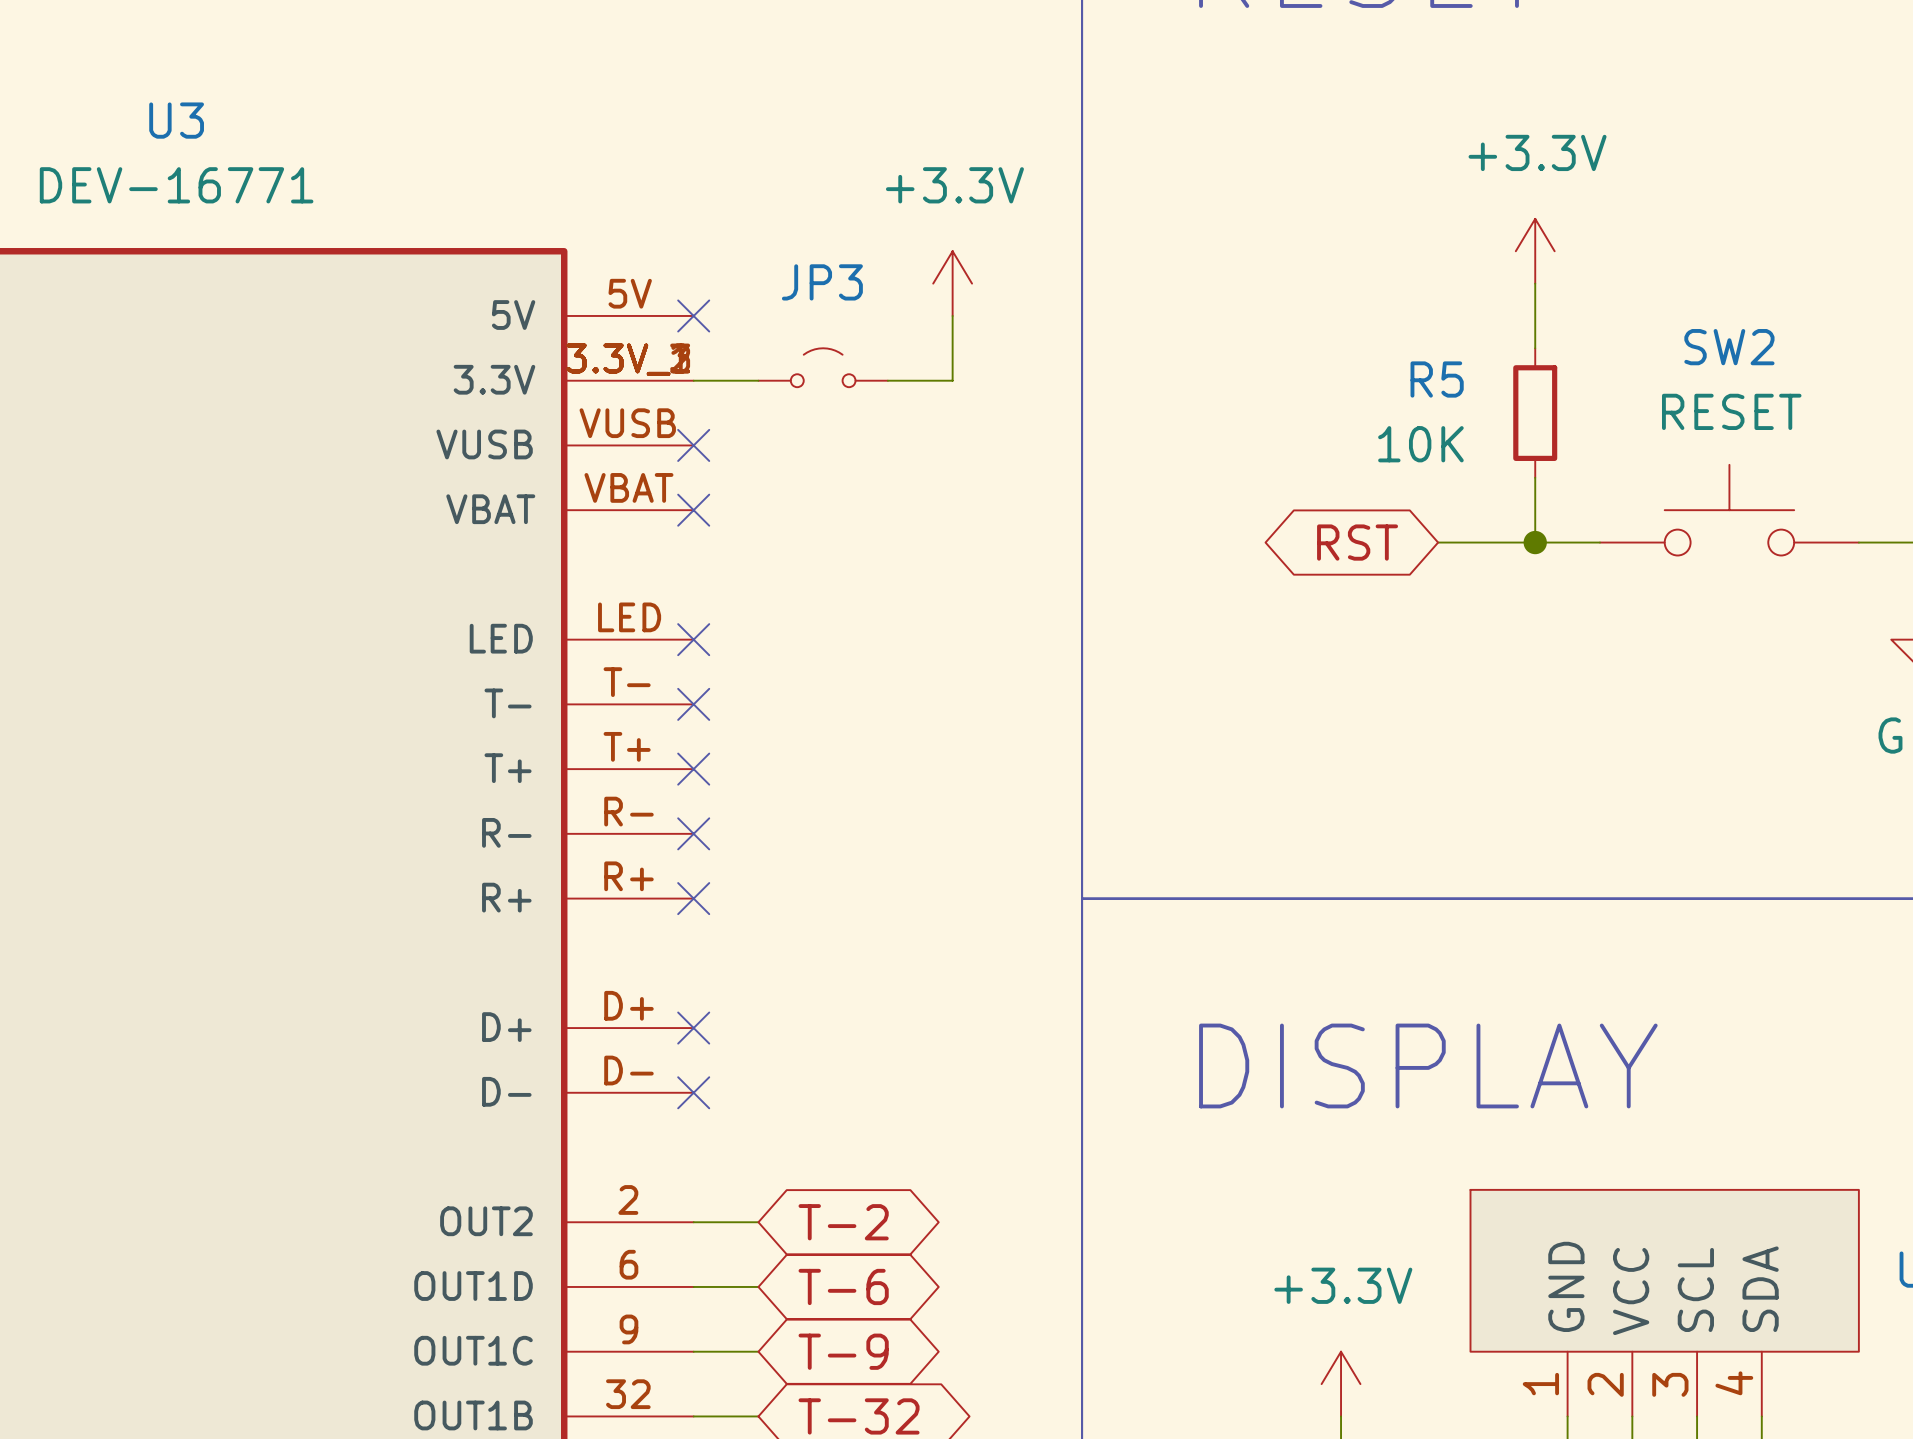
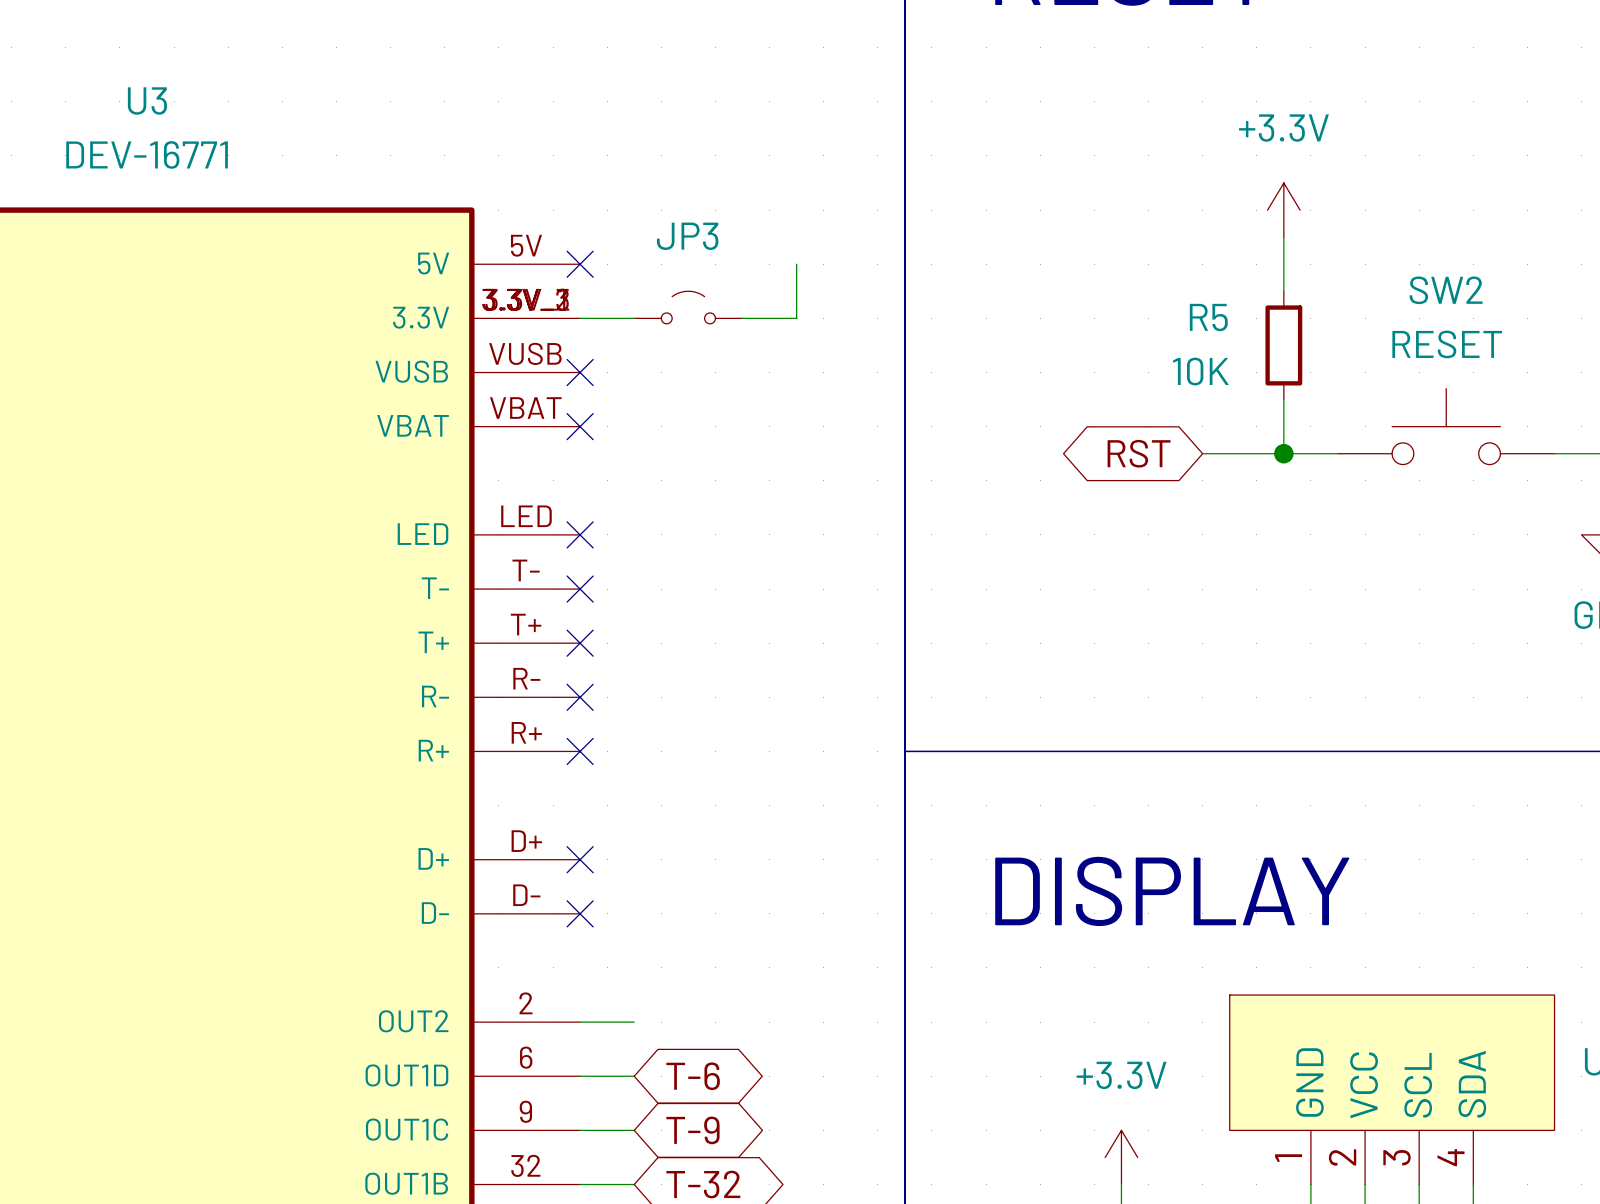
power symbol: +3.3V (952, 283) -> none
global label: T-2 (843, 1222) -> none

